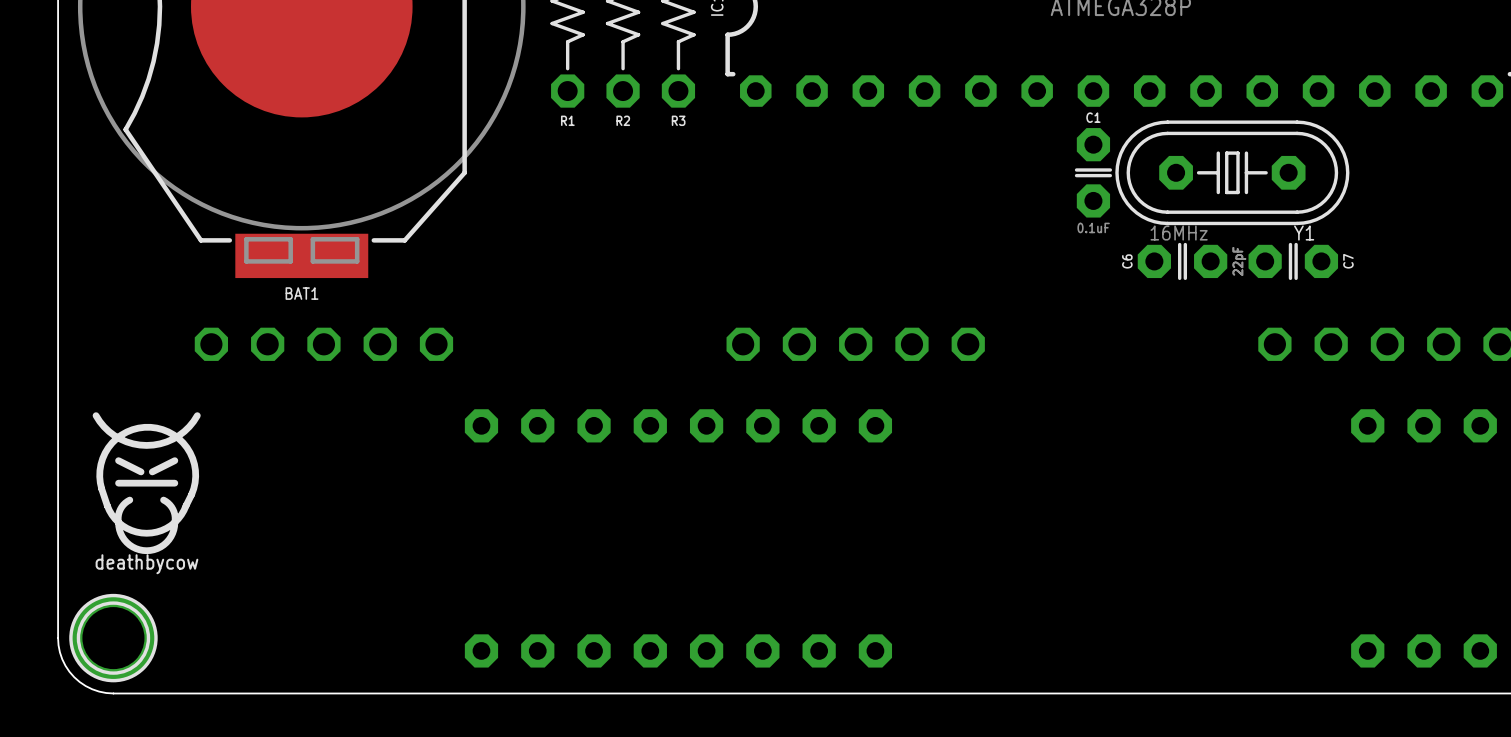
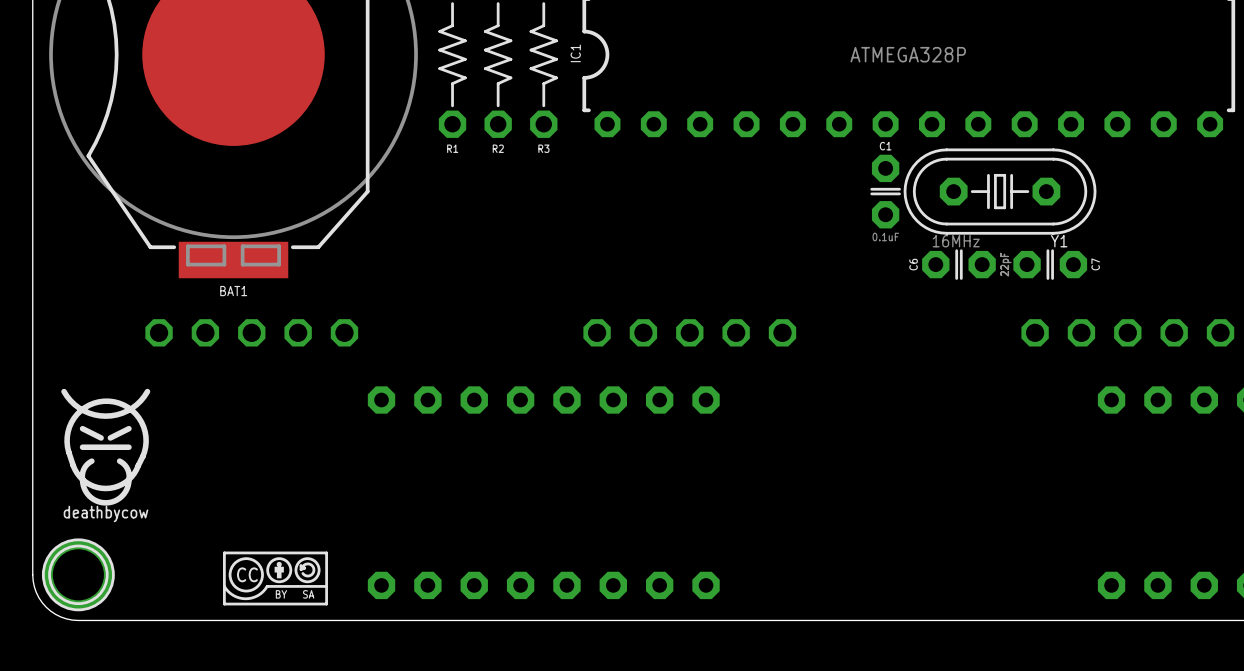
drawing: none -> [223, 551, 328, 606]

